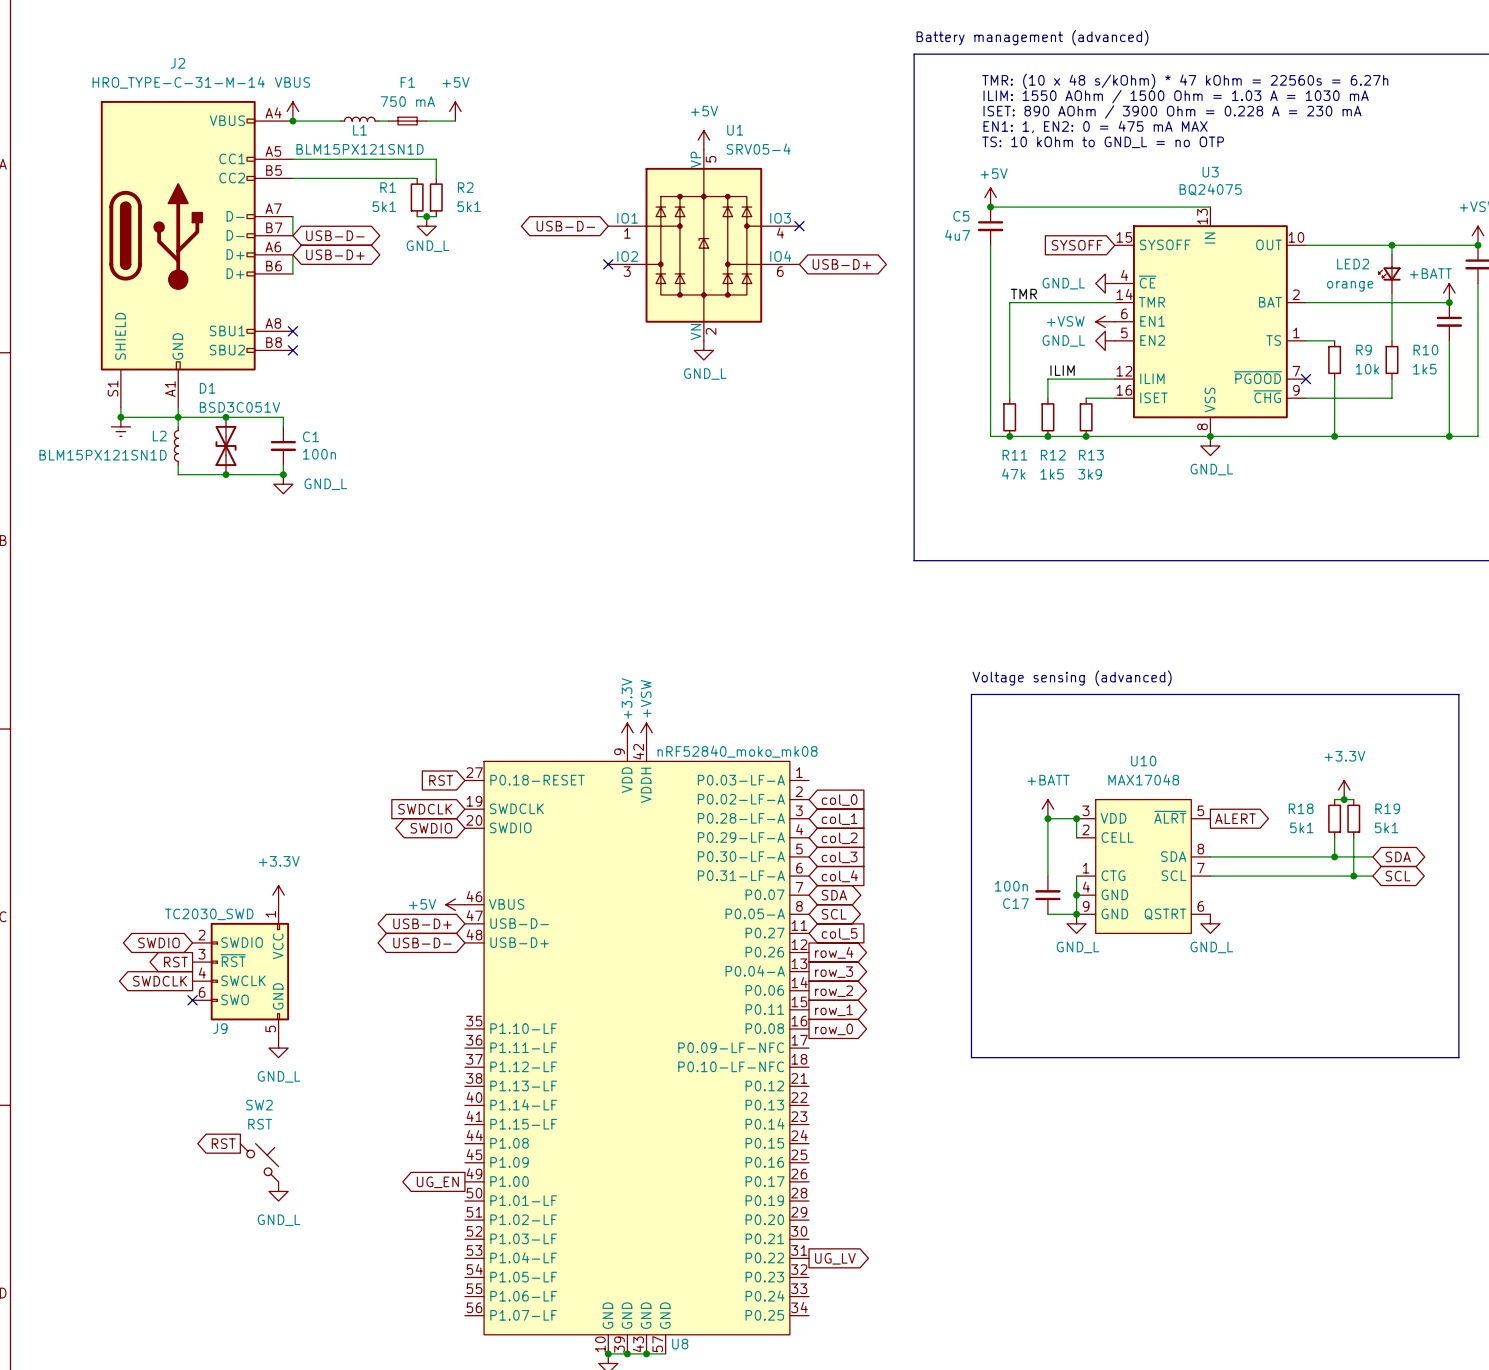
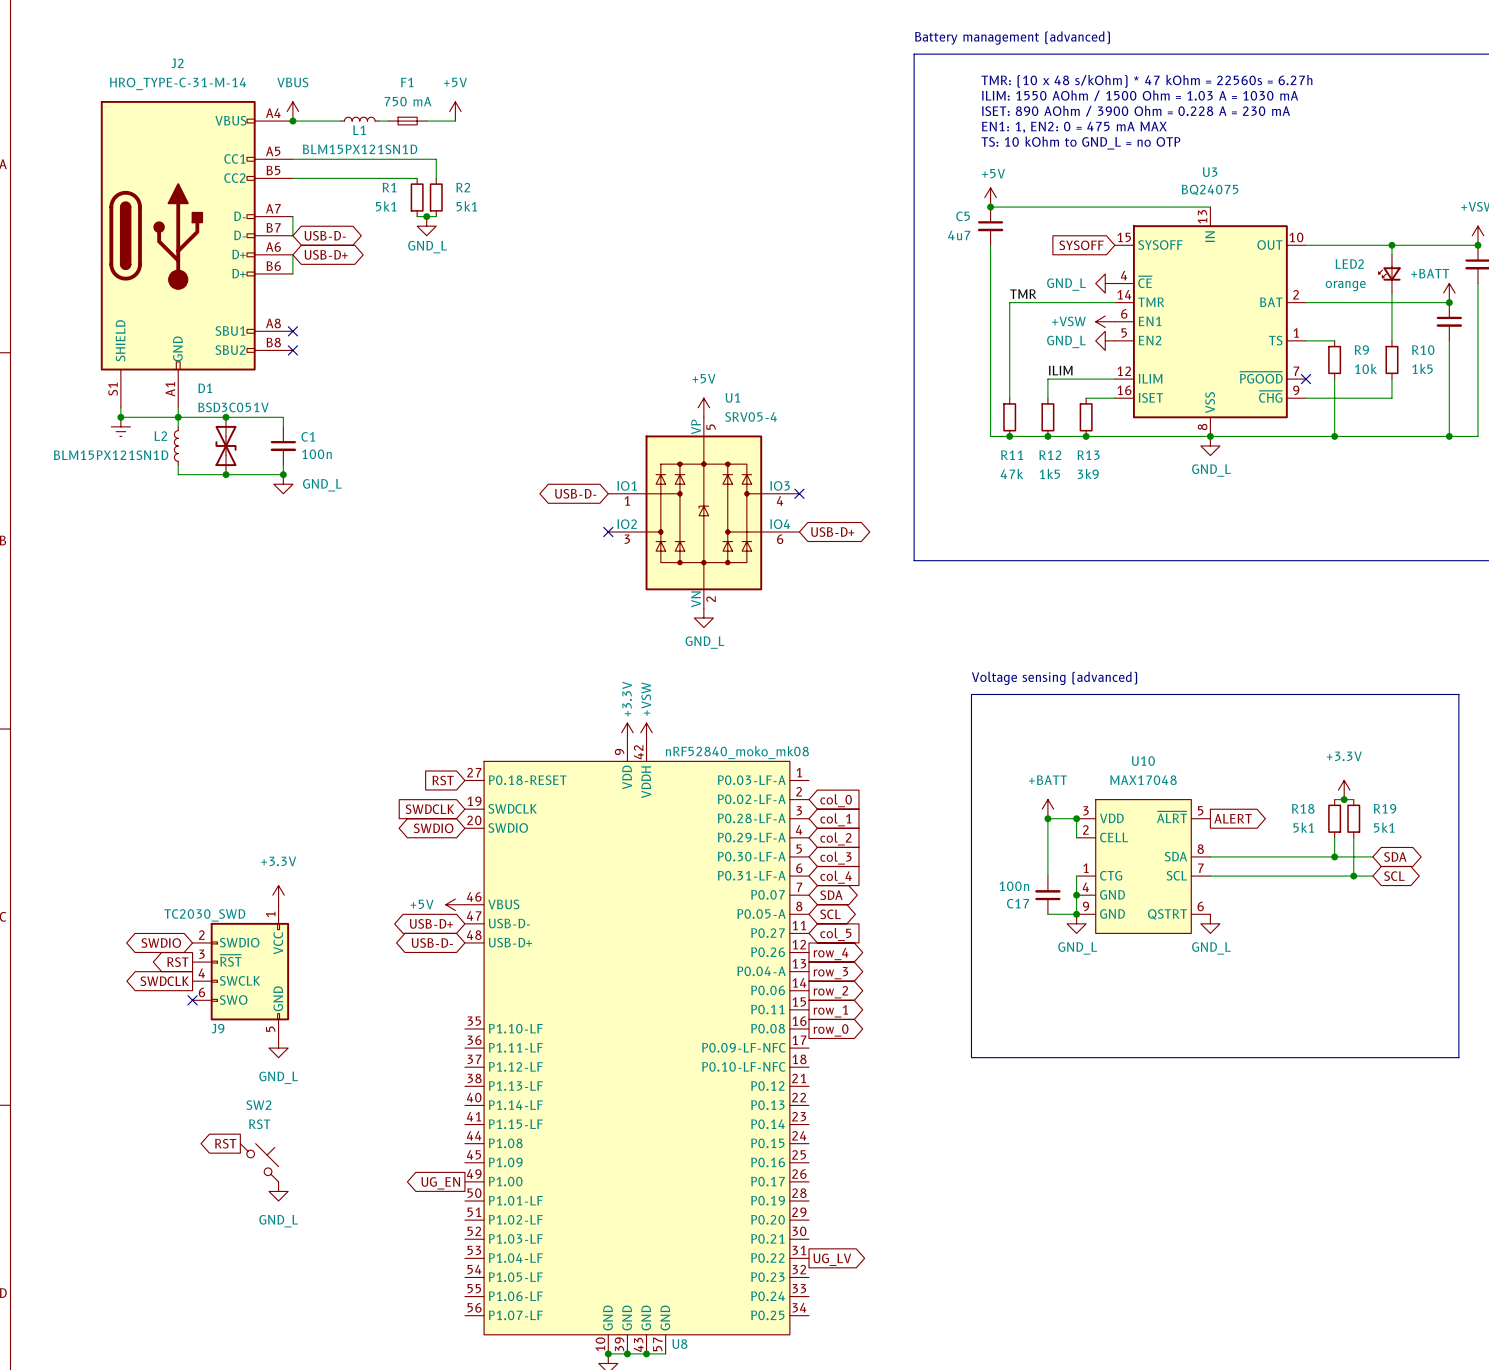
power symbol: +5V (703, 140) -> none
global label: USB-D- (565, 226) -> none
no-connect mark: (799, 226) -> none
U1 position: (703, 245) -> (703, 512)
no-connect mark: (608, 264) -> none
global label: USB-D+ (841, 264) -> none
power symbol: GND_L (703, 350) -> none
power symbol: none -> +5V (703, 407)
global label: none -> USB-D- (575, 493)
no-connect mark: none -> (799, 493)
no-connect mark: none -> (608, 532)
global label: none -> USB-D+ (832, 532)
power symbol: none -> GND_L (703, 618)

